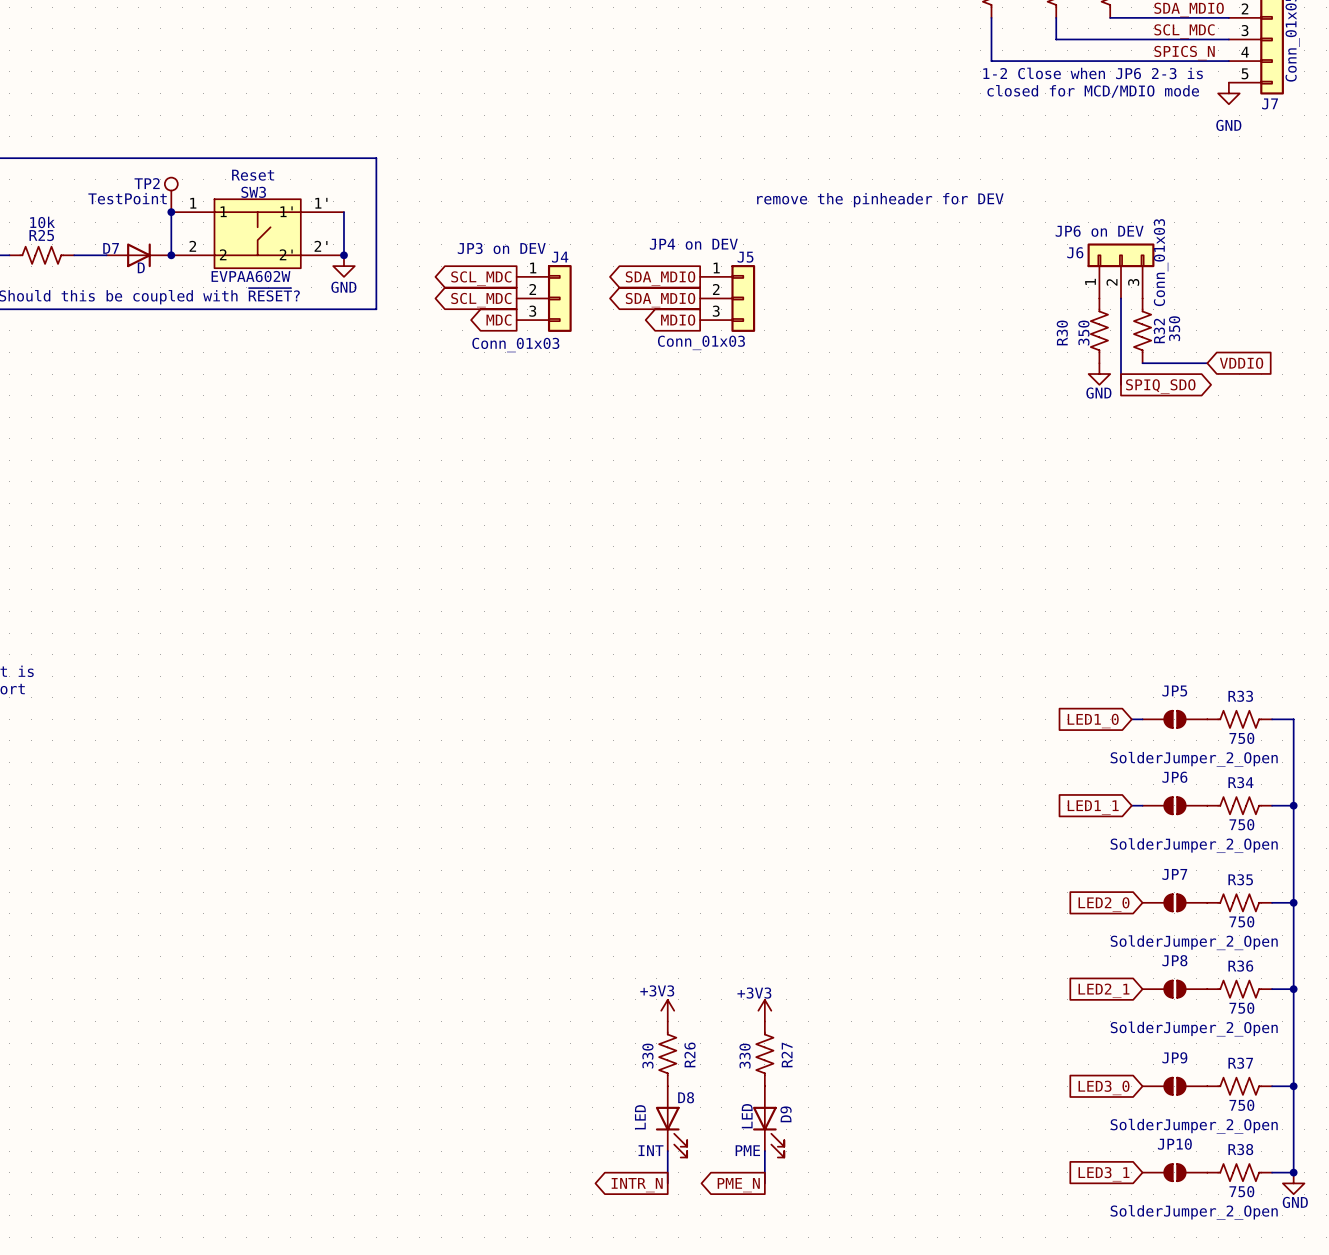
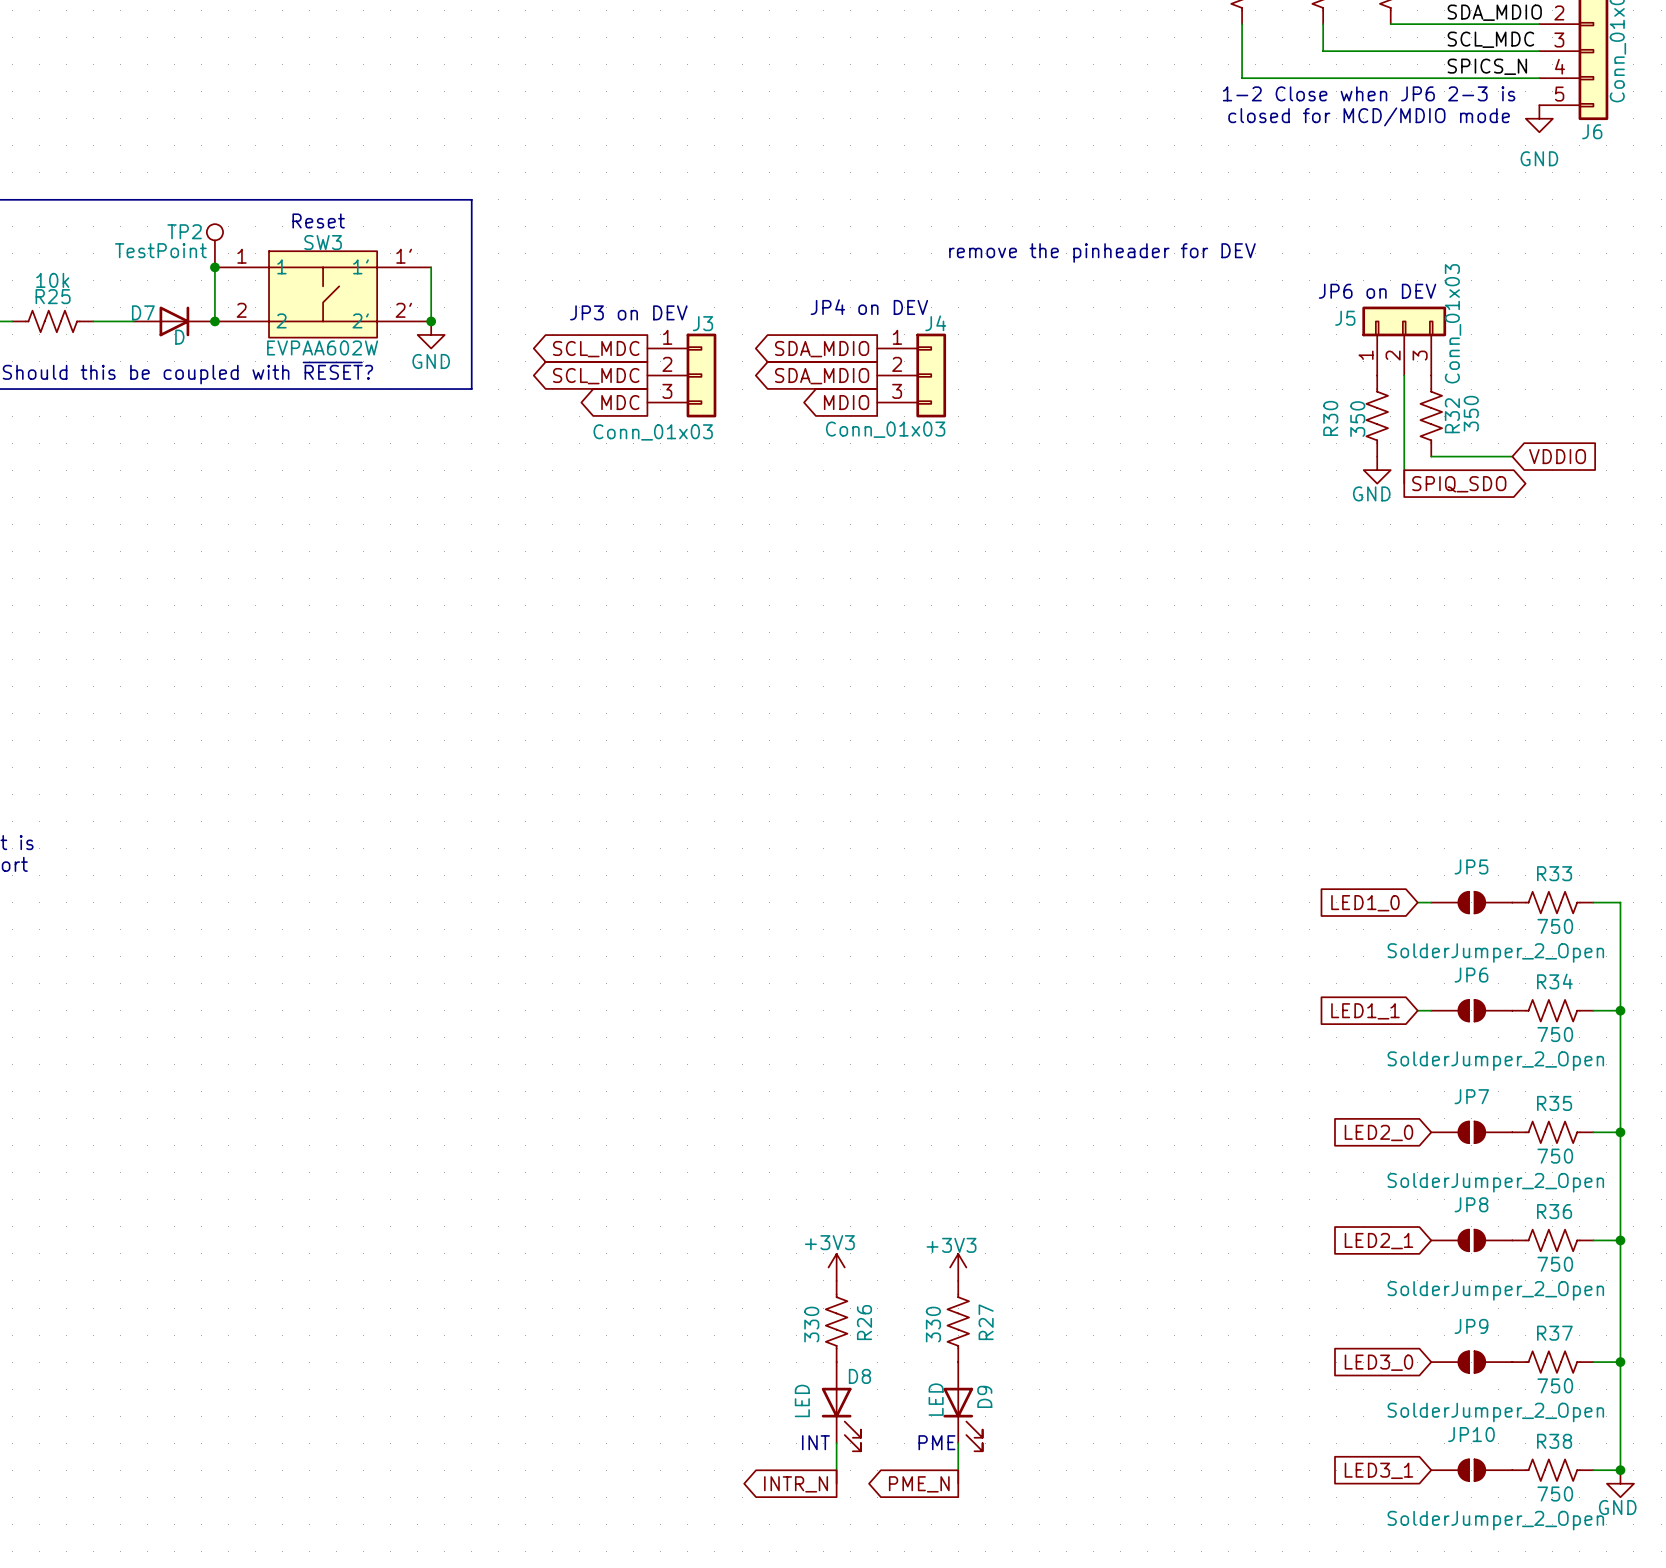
J7 name: J7 (1270, 103) -> J6 (1592, 131)
J6 name: J6 (1075, 252) -> J5 (1345, 318)
J4 name: J4 (560, 257) -> J3 (702, 323)
J5 name: J5 (745, 257) -> J4 (935, 323)

